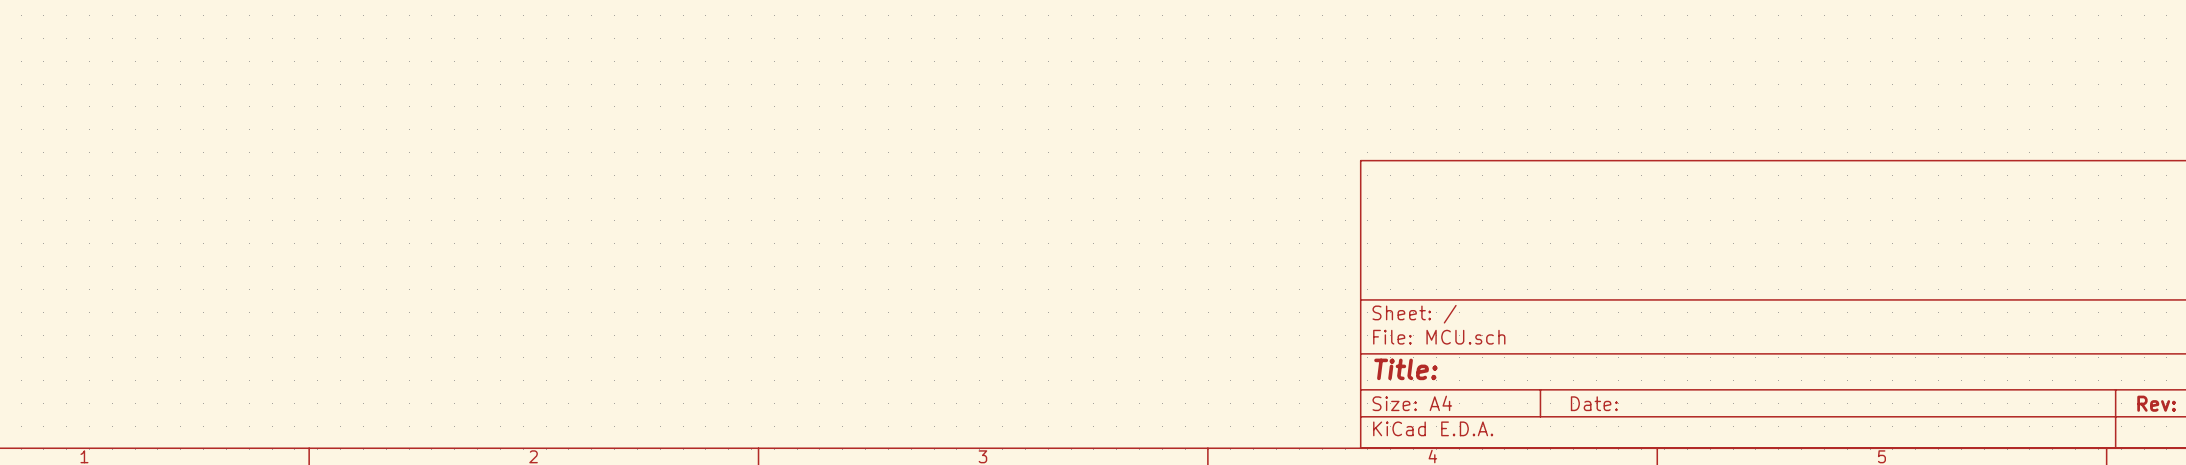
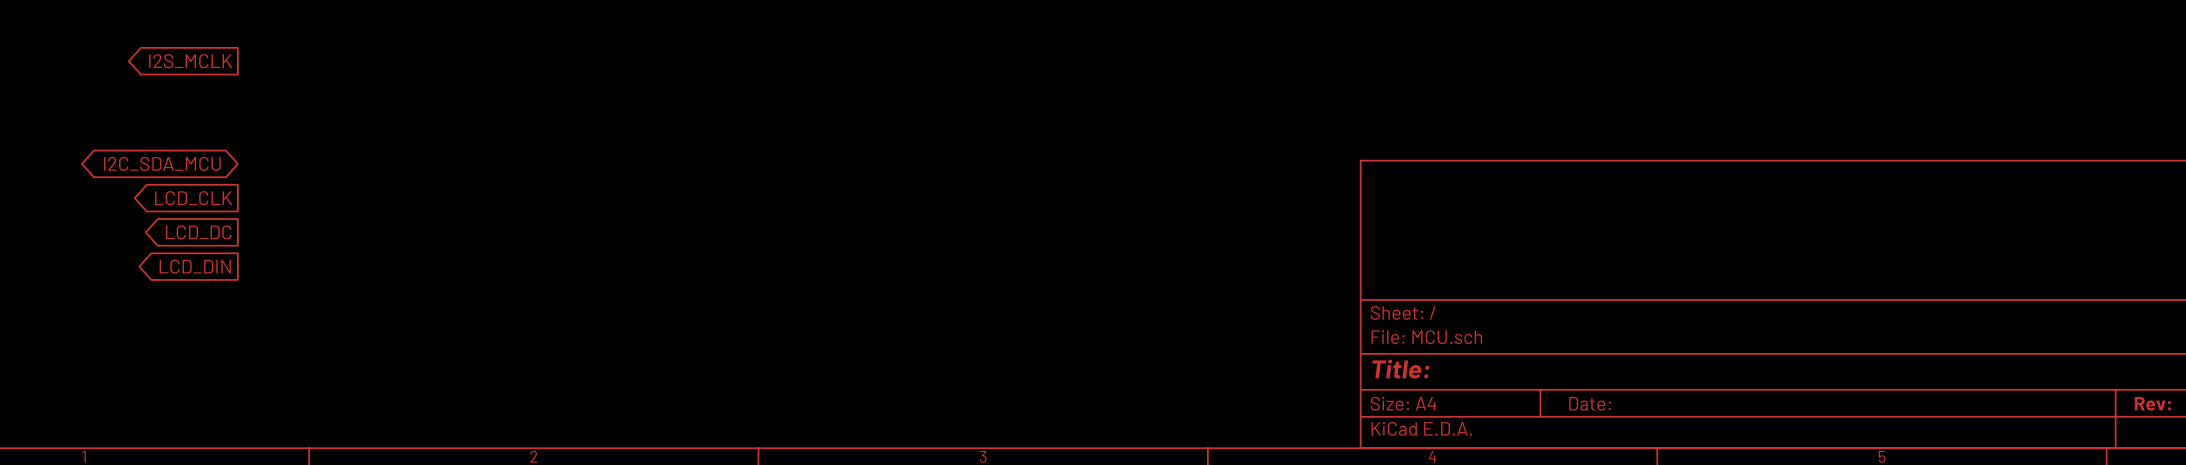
global label: none -> I2S_MCLK (190, 61)
global label: none -> I2C_SDA_MCU (162, 163)
global label: none -> LCD_CLK (193, 198)
global label: none -> LCD_DC (198, 232)
global label: none -> LCD_DIN (195, 266)

